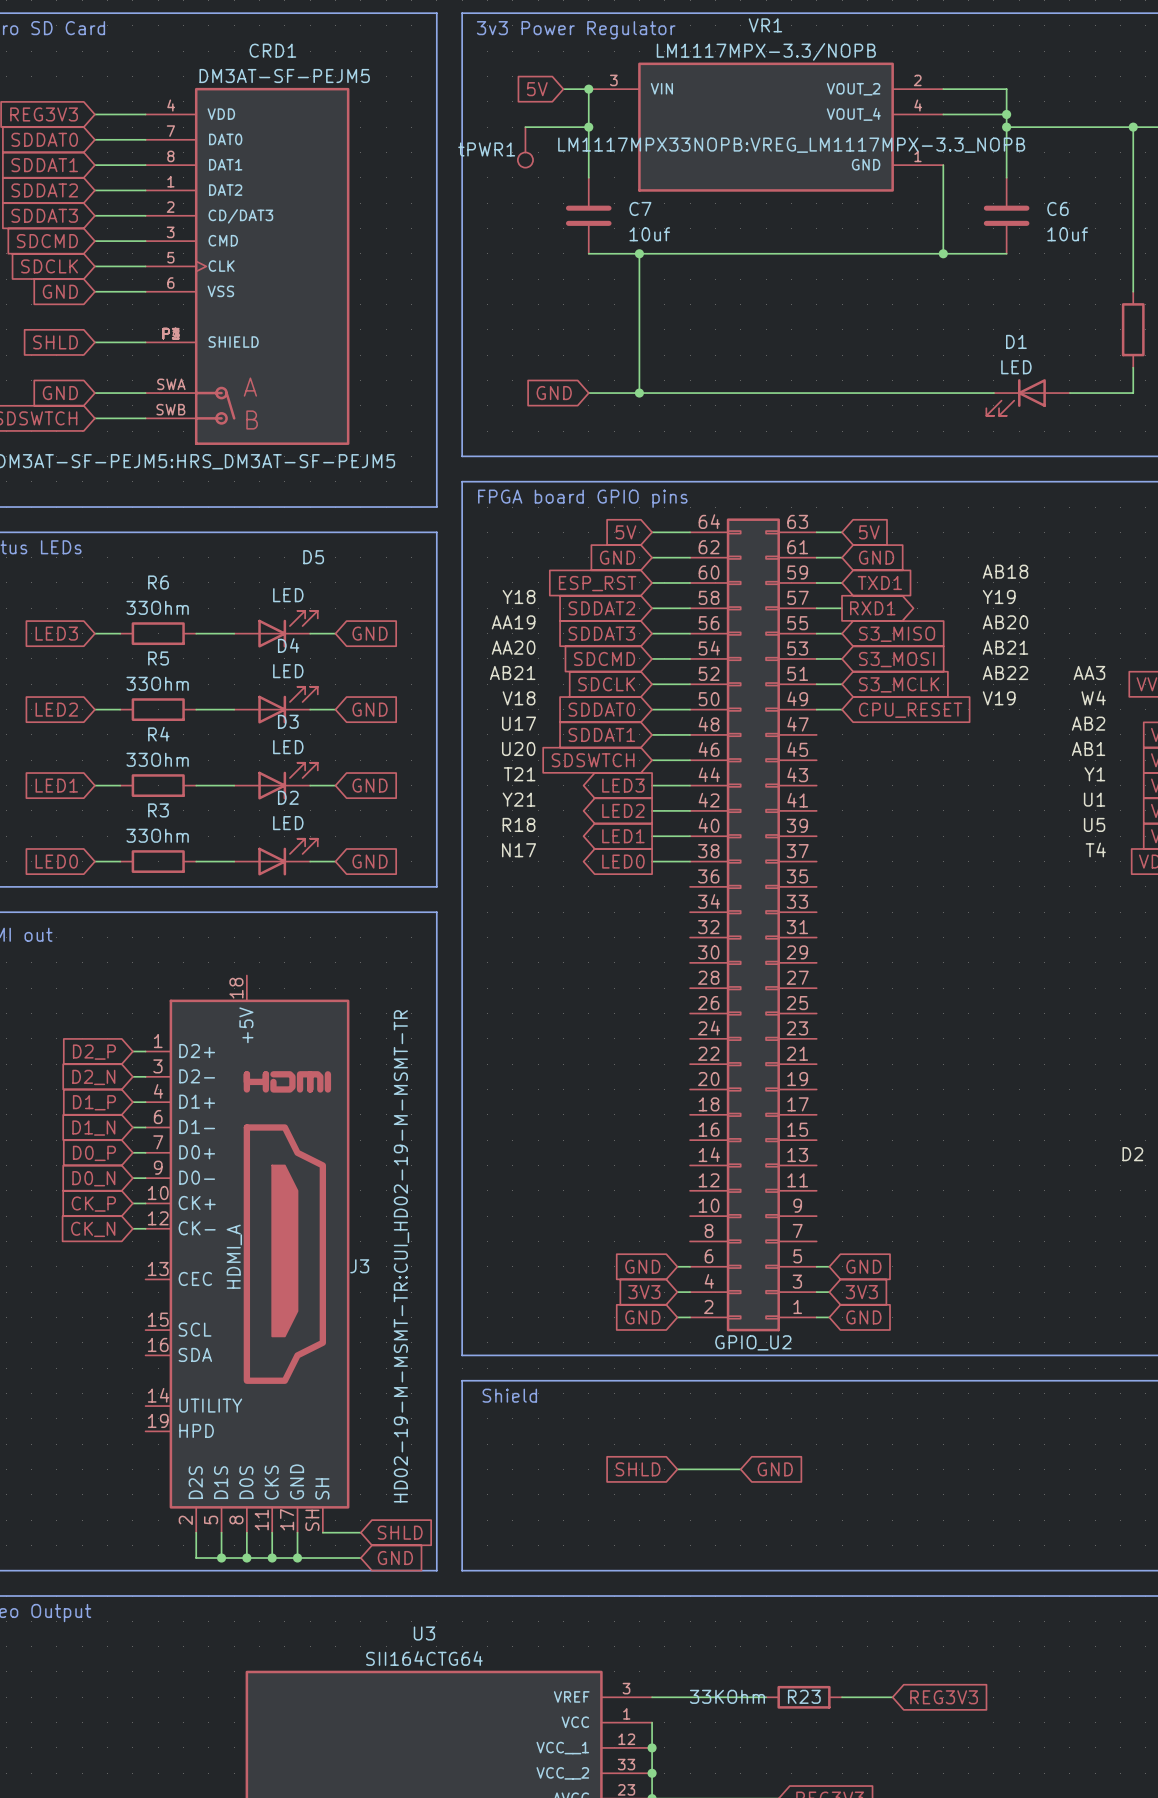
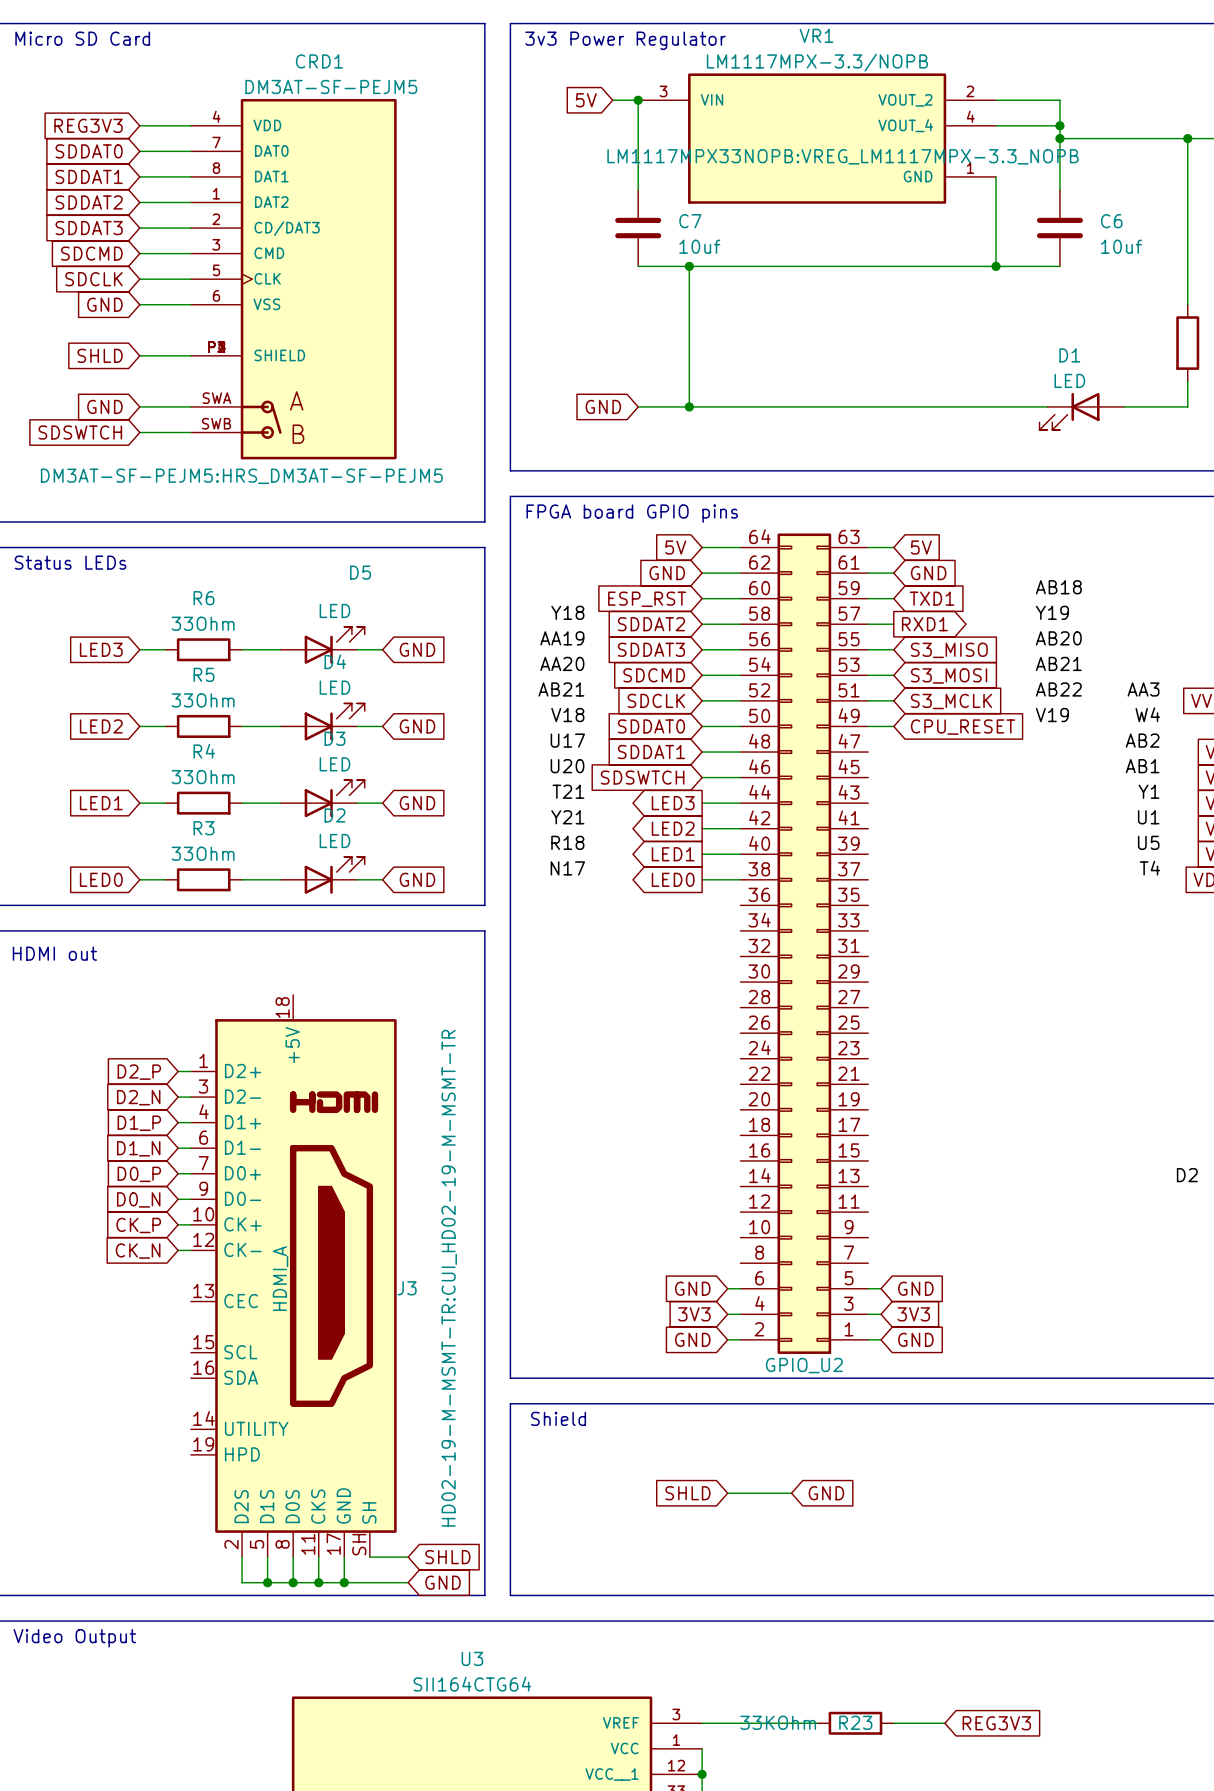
wire: (525, 127) (588, 127) -> none
junction: (588, 127) -> none
tPWR1: (525, 147) -> none

